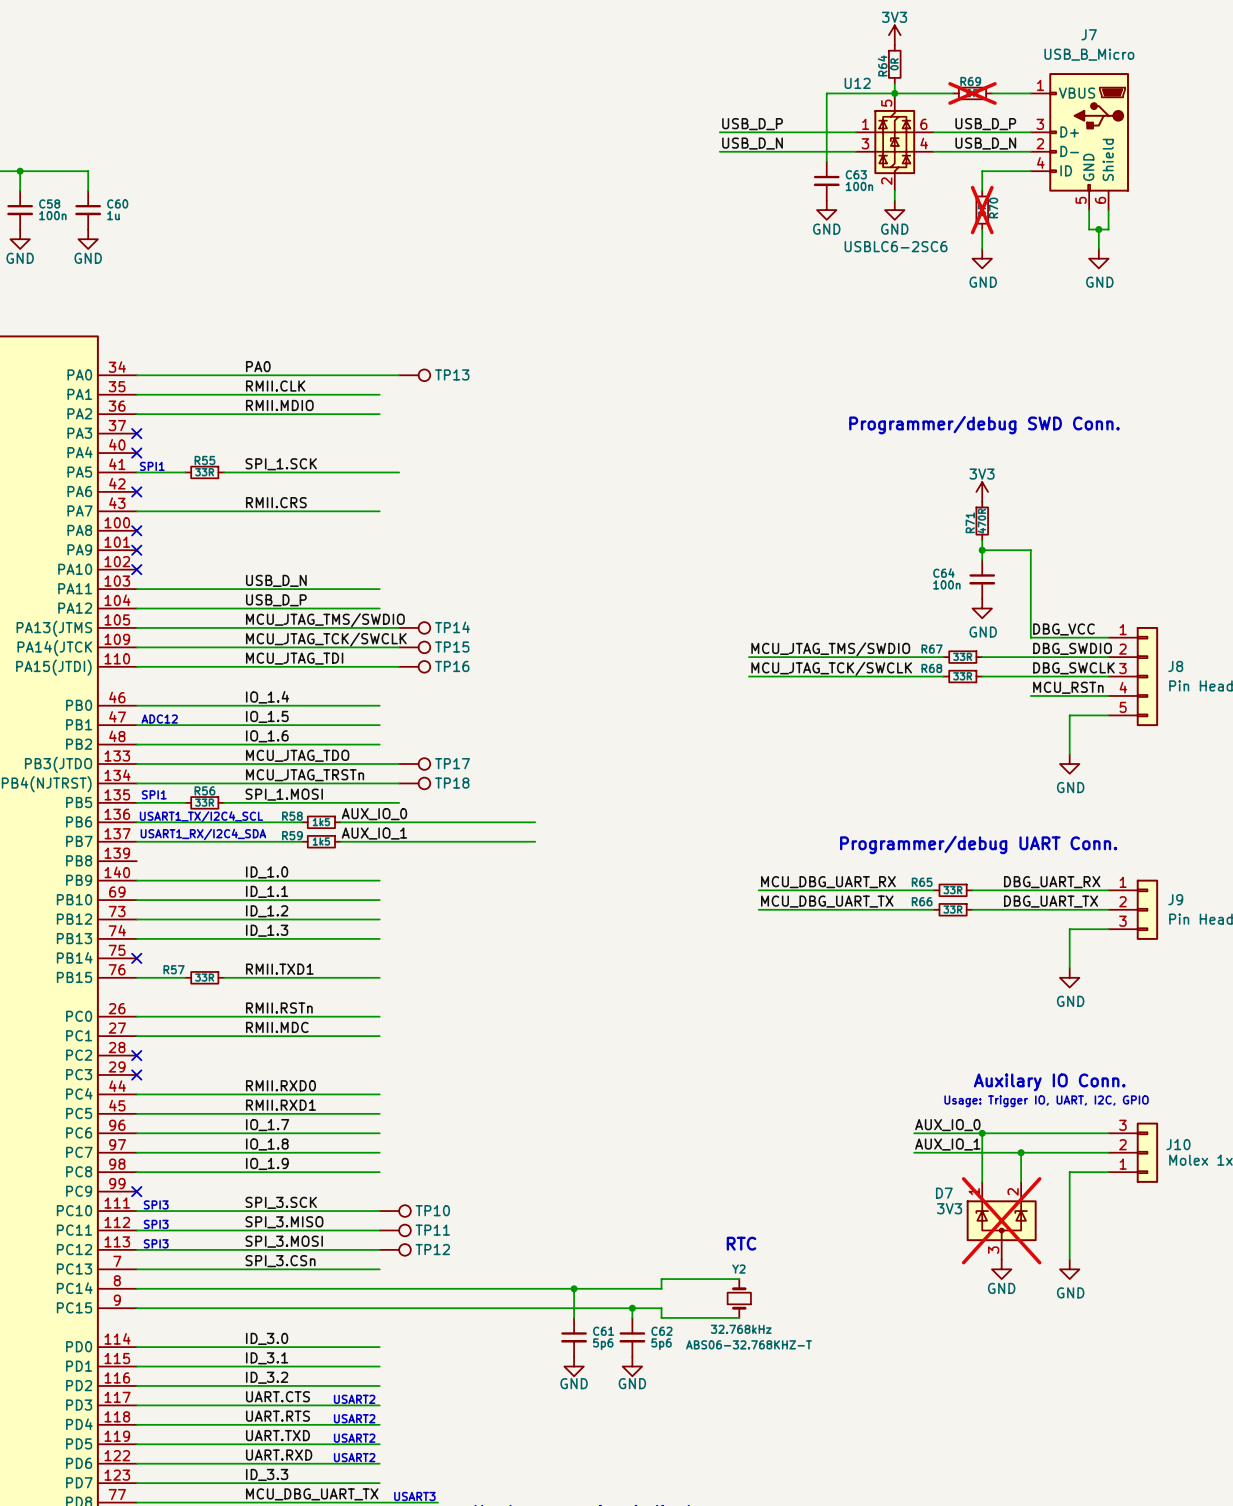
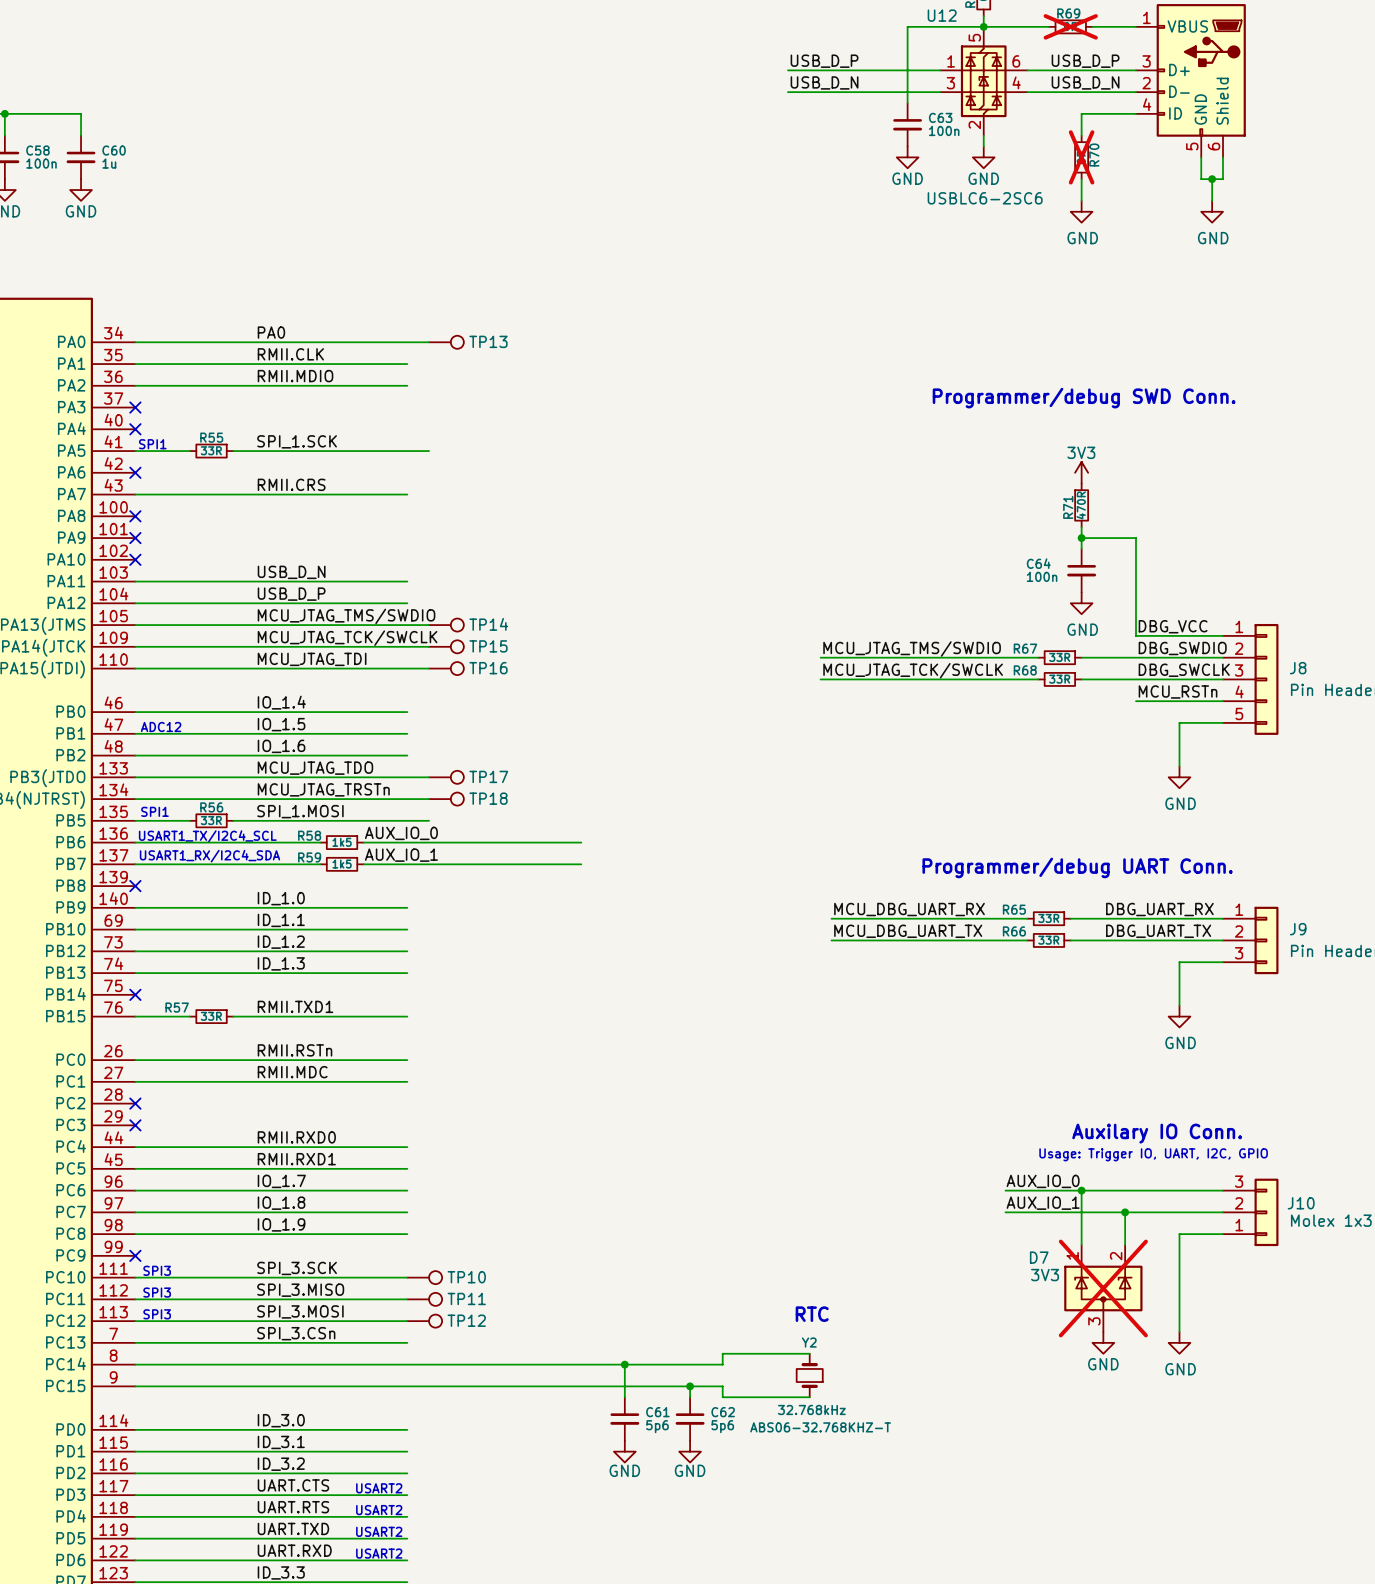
no-connect mark: none -> (135, 886)

